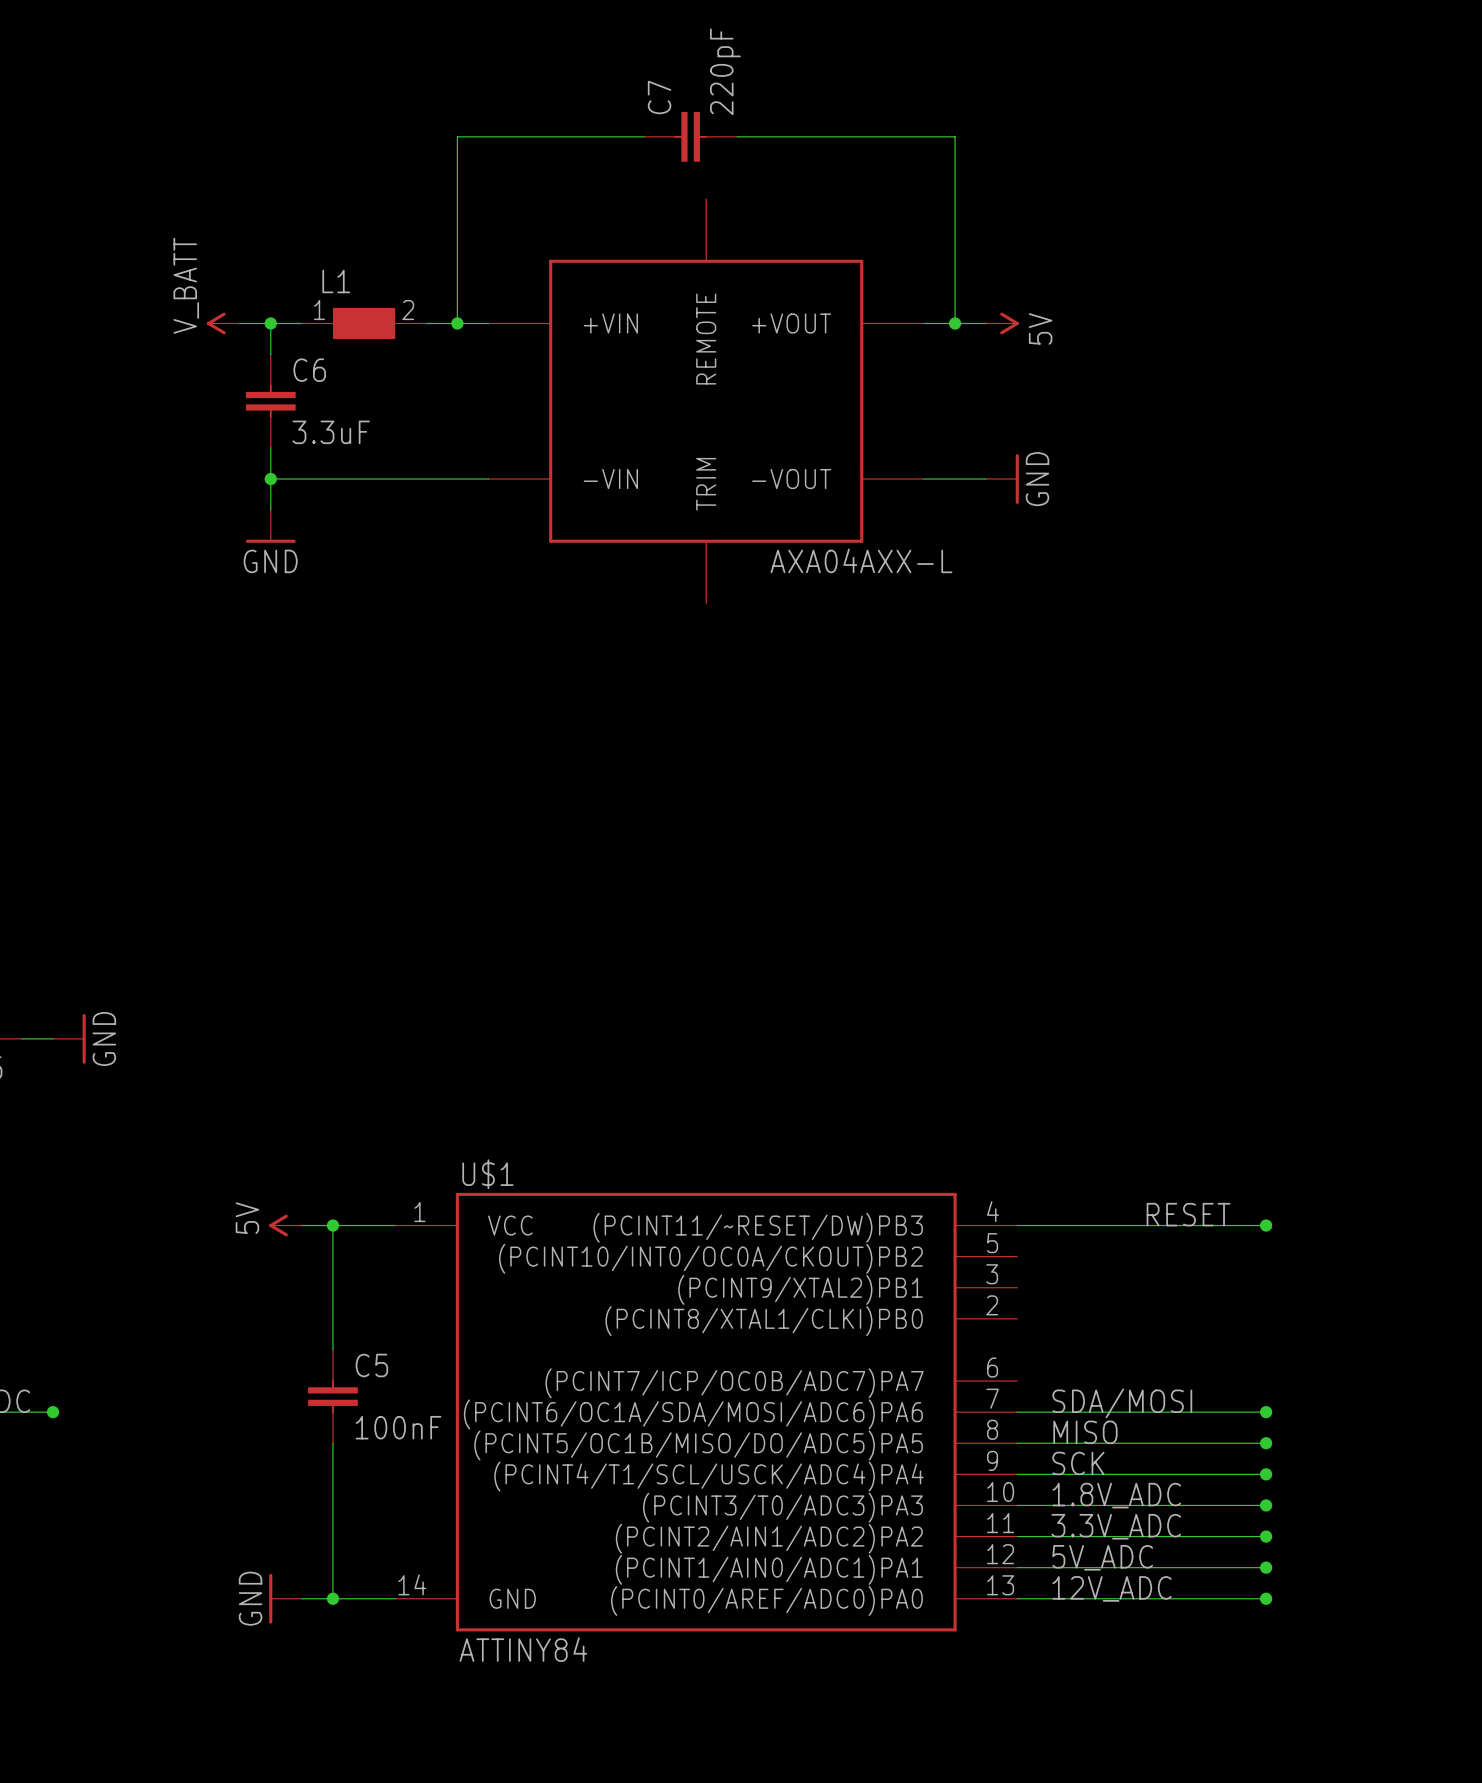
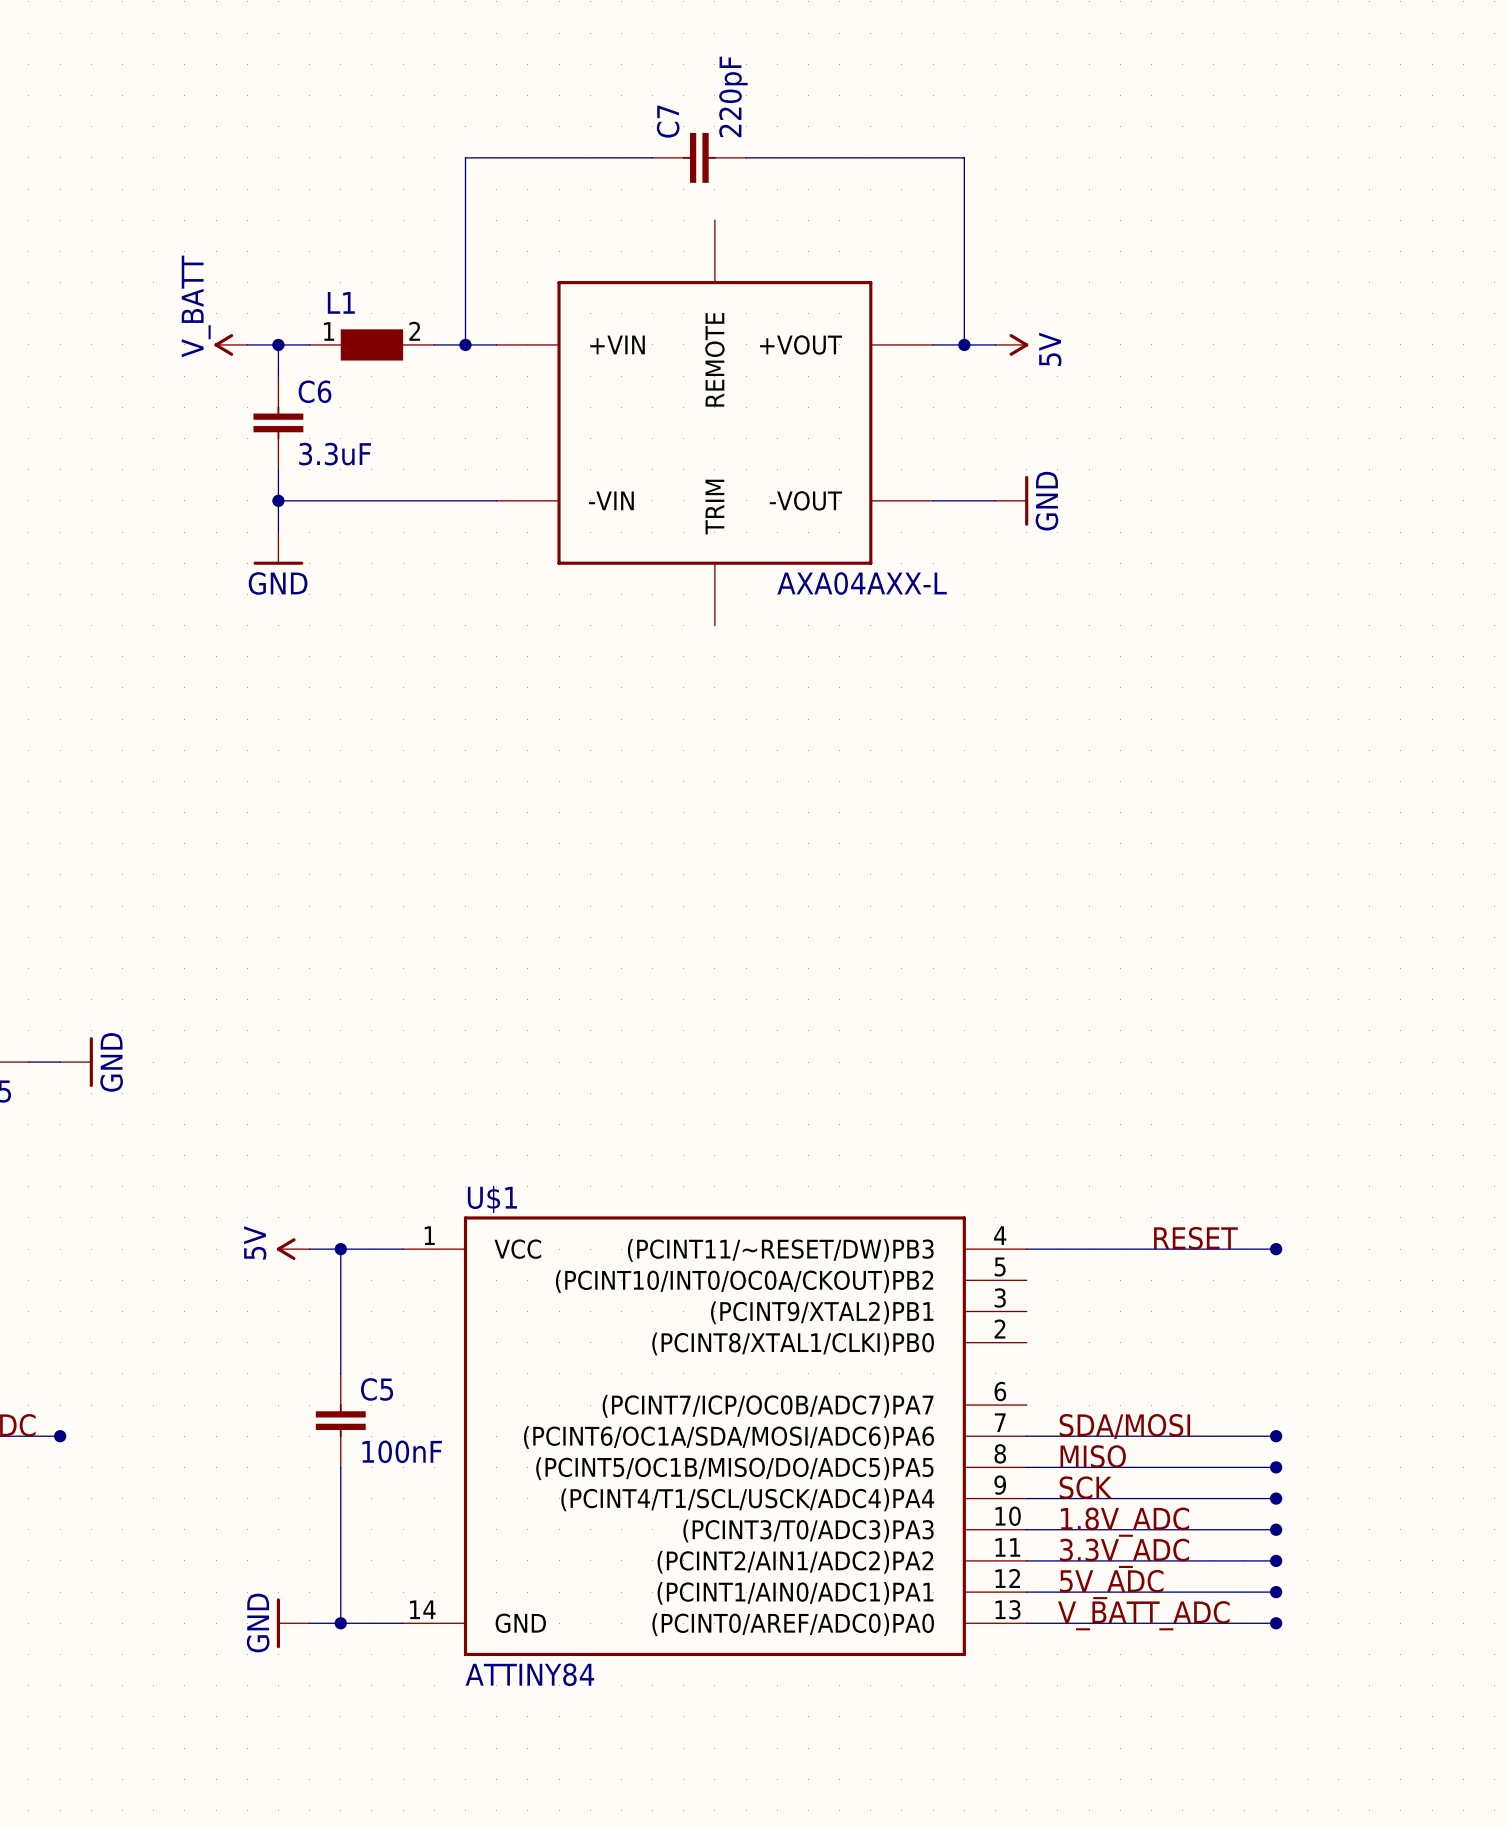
label: 12V_ADC (1112, 1588) -> V_BATT_ADC (1143, 1615)

